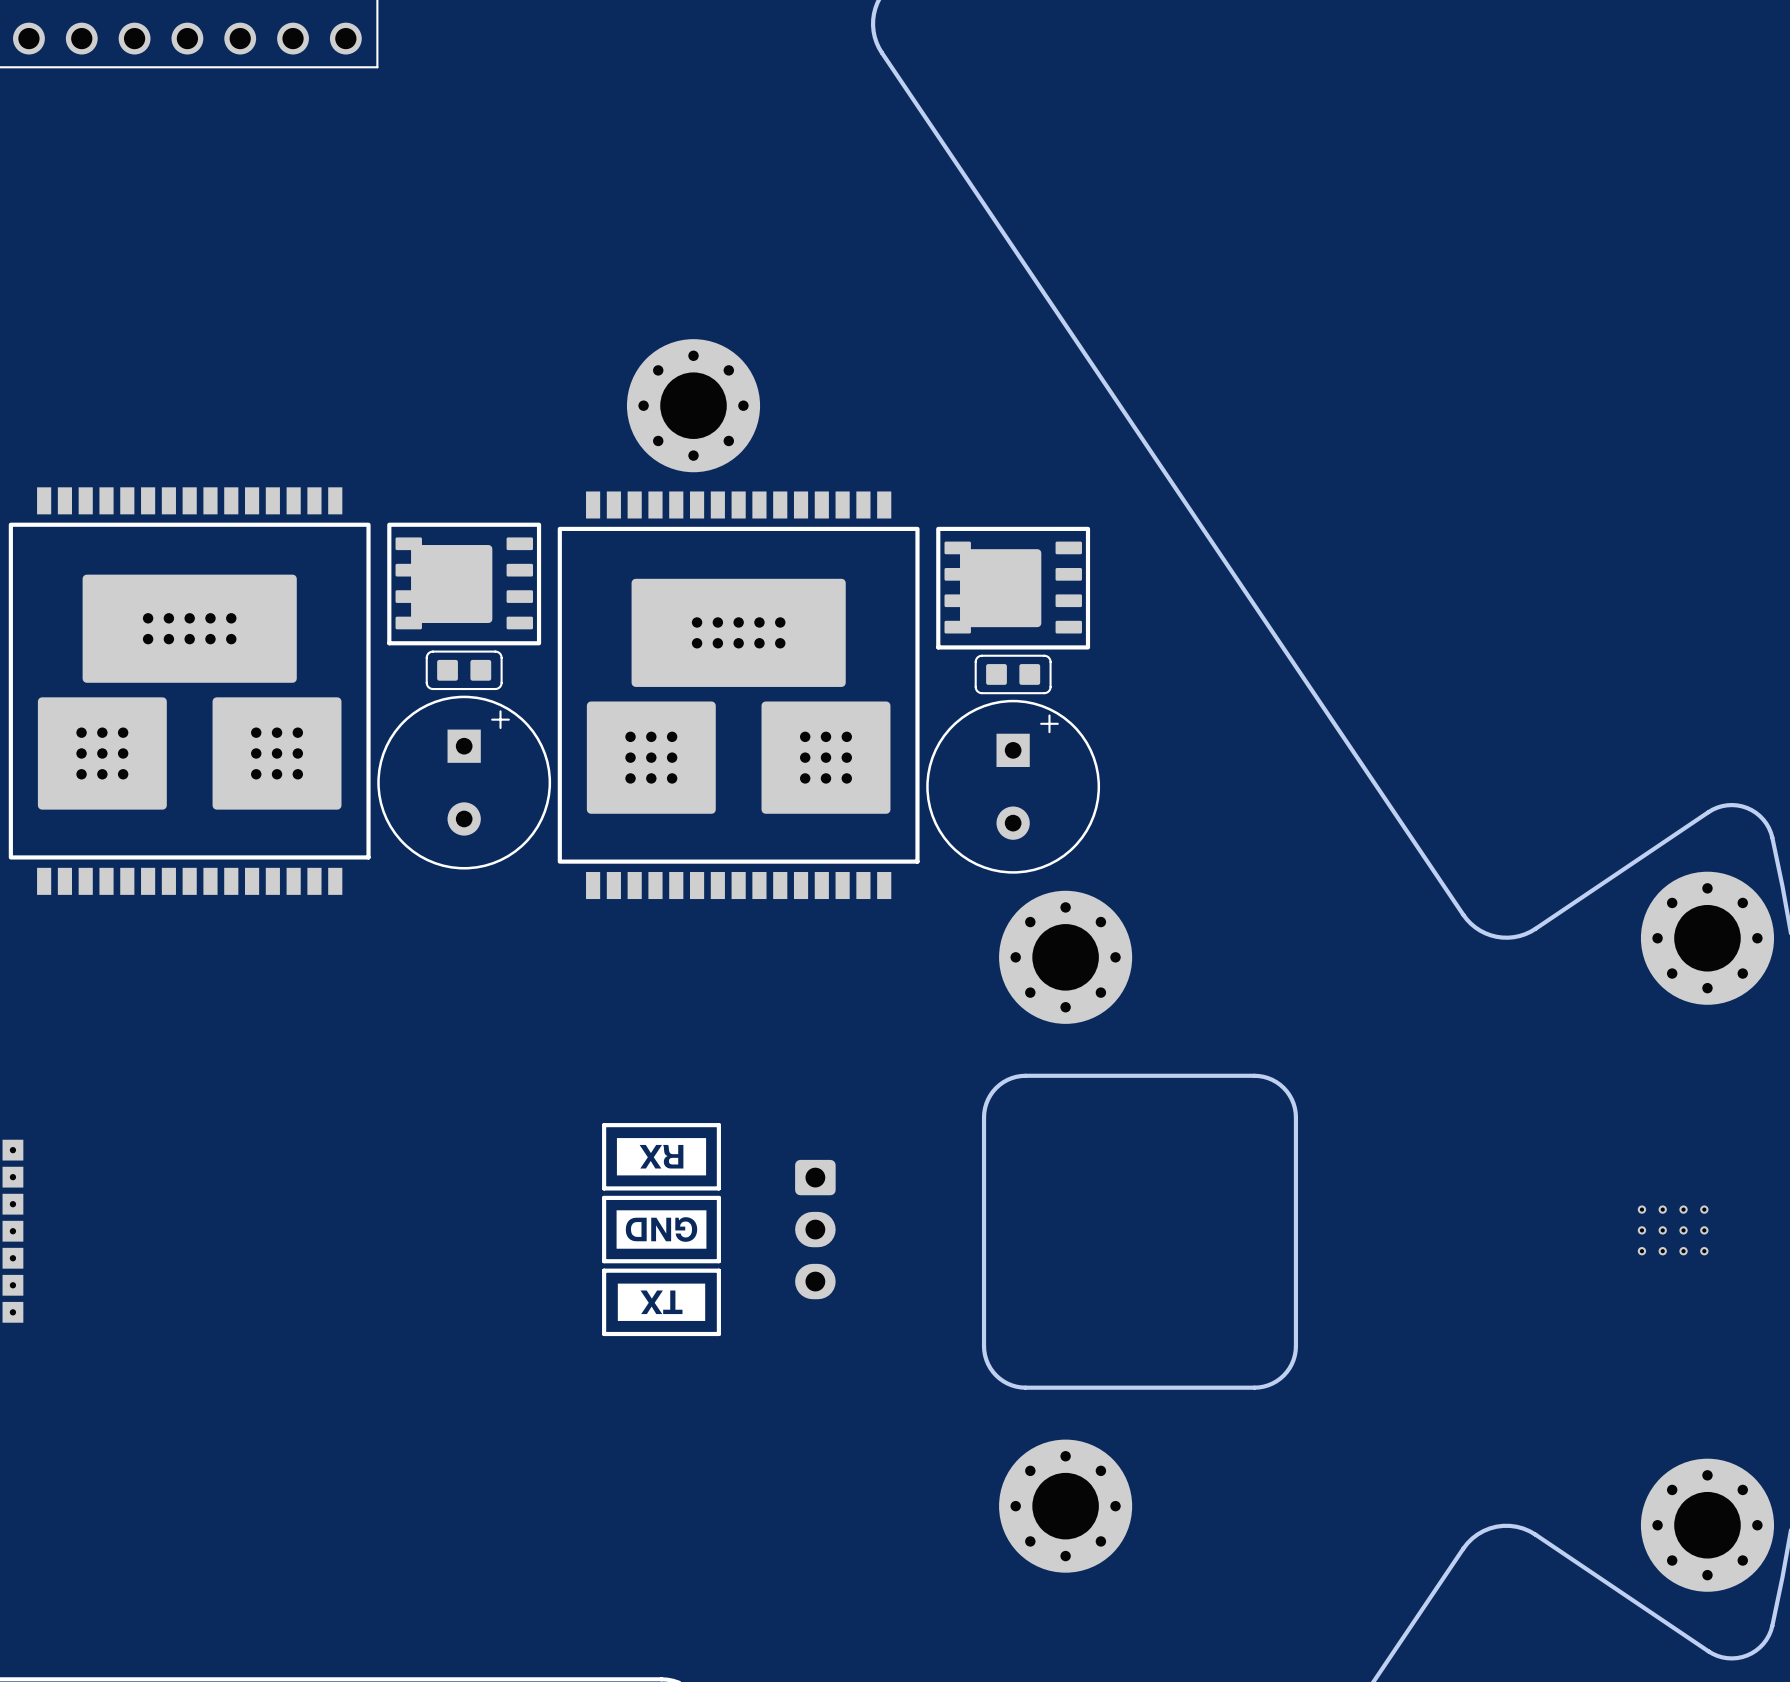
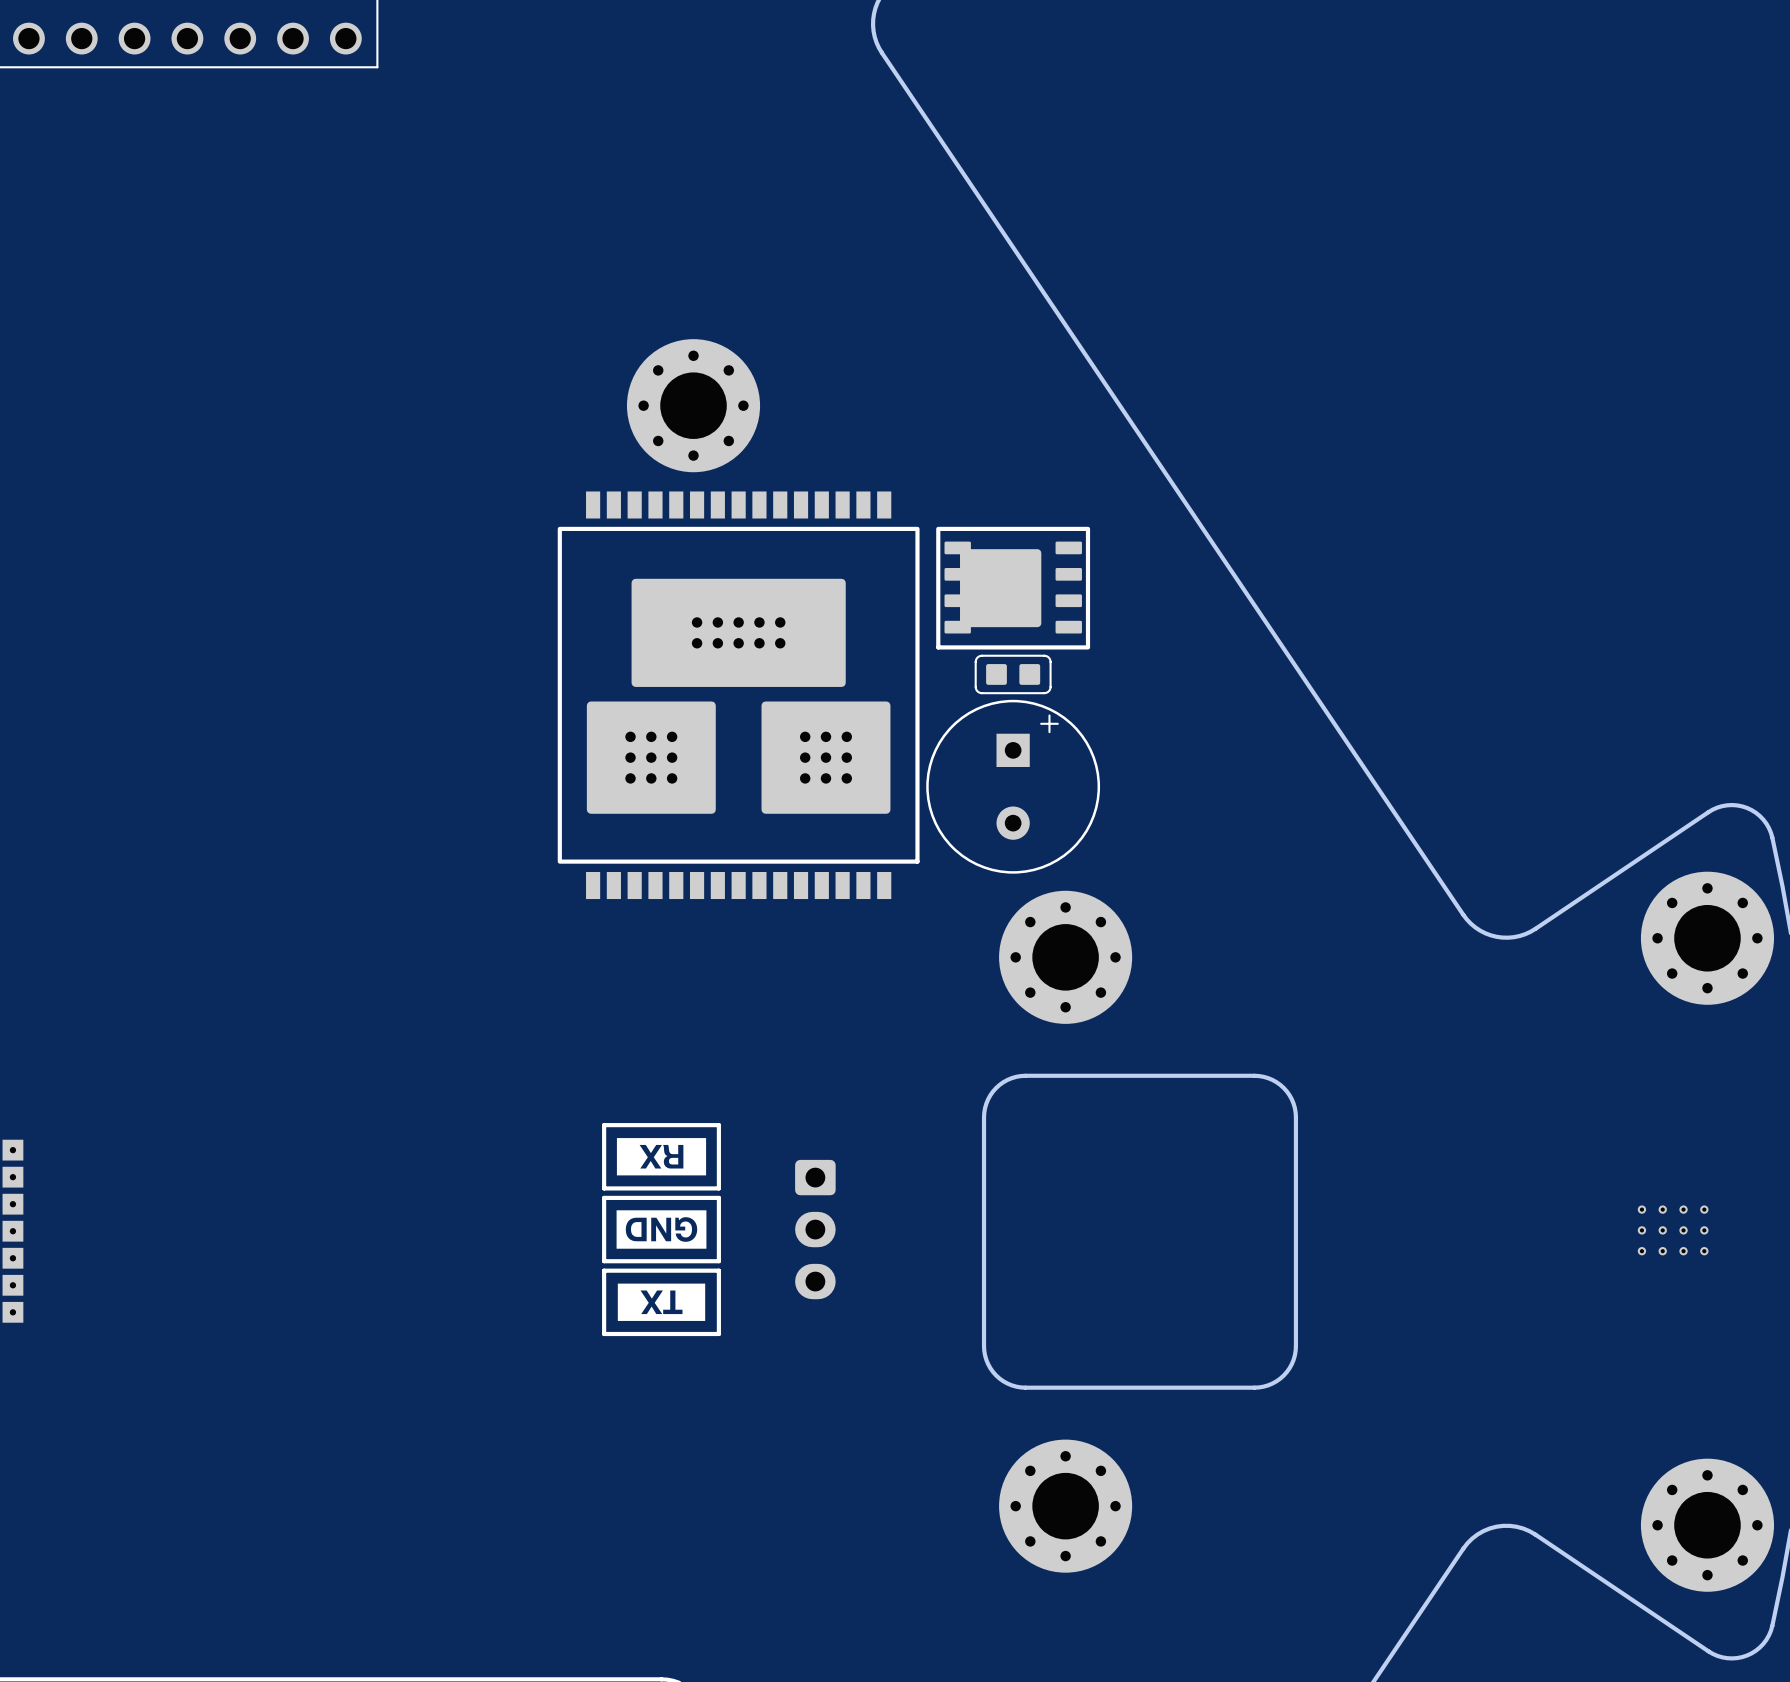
part: (464, 584) -> none
part: (464, 670) -> none
part: (189, 691) -> none
part: (464, 782) -> none

